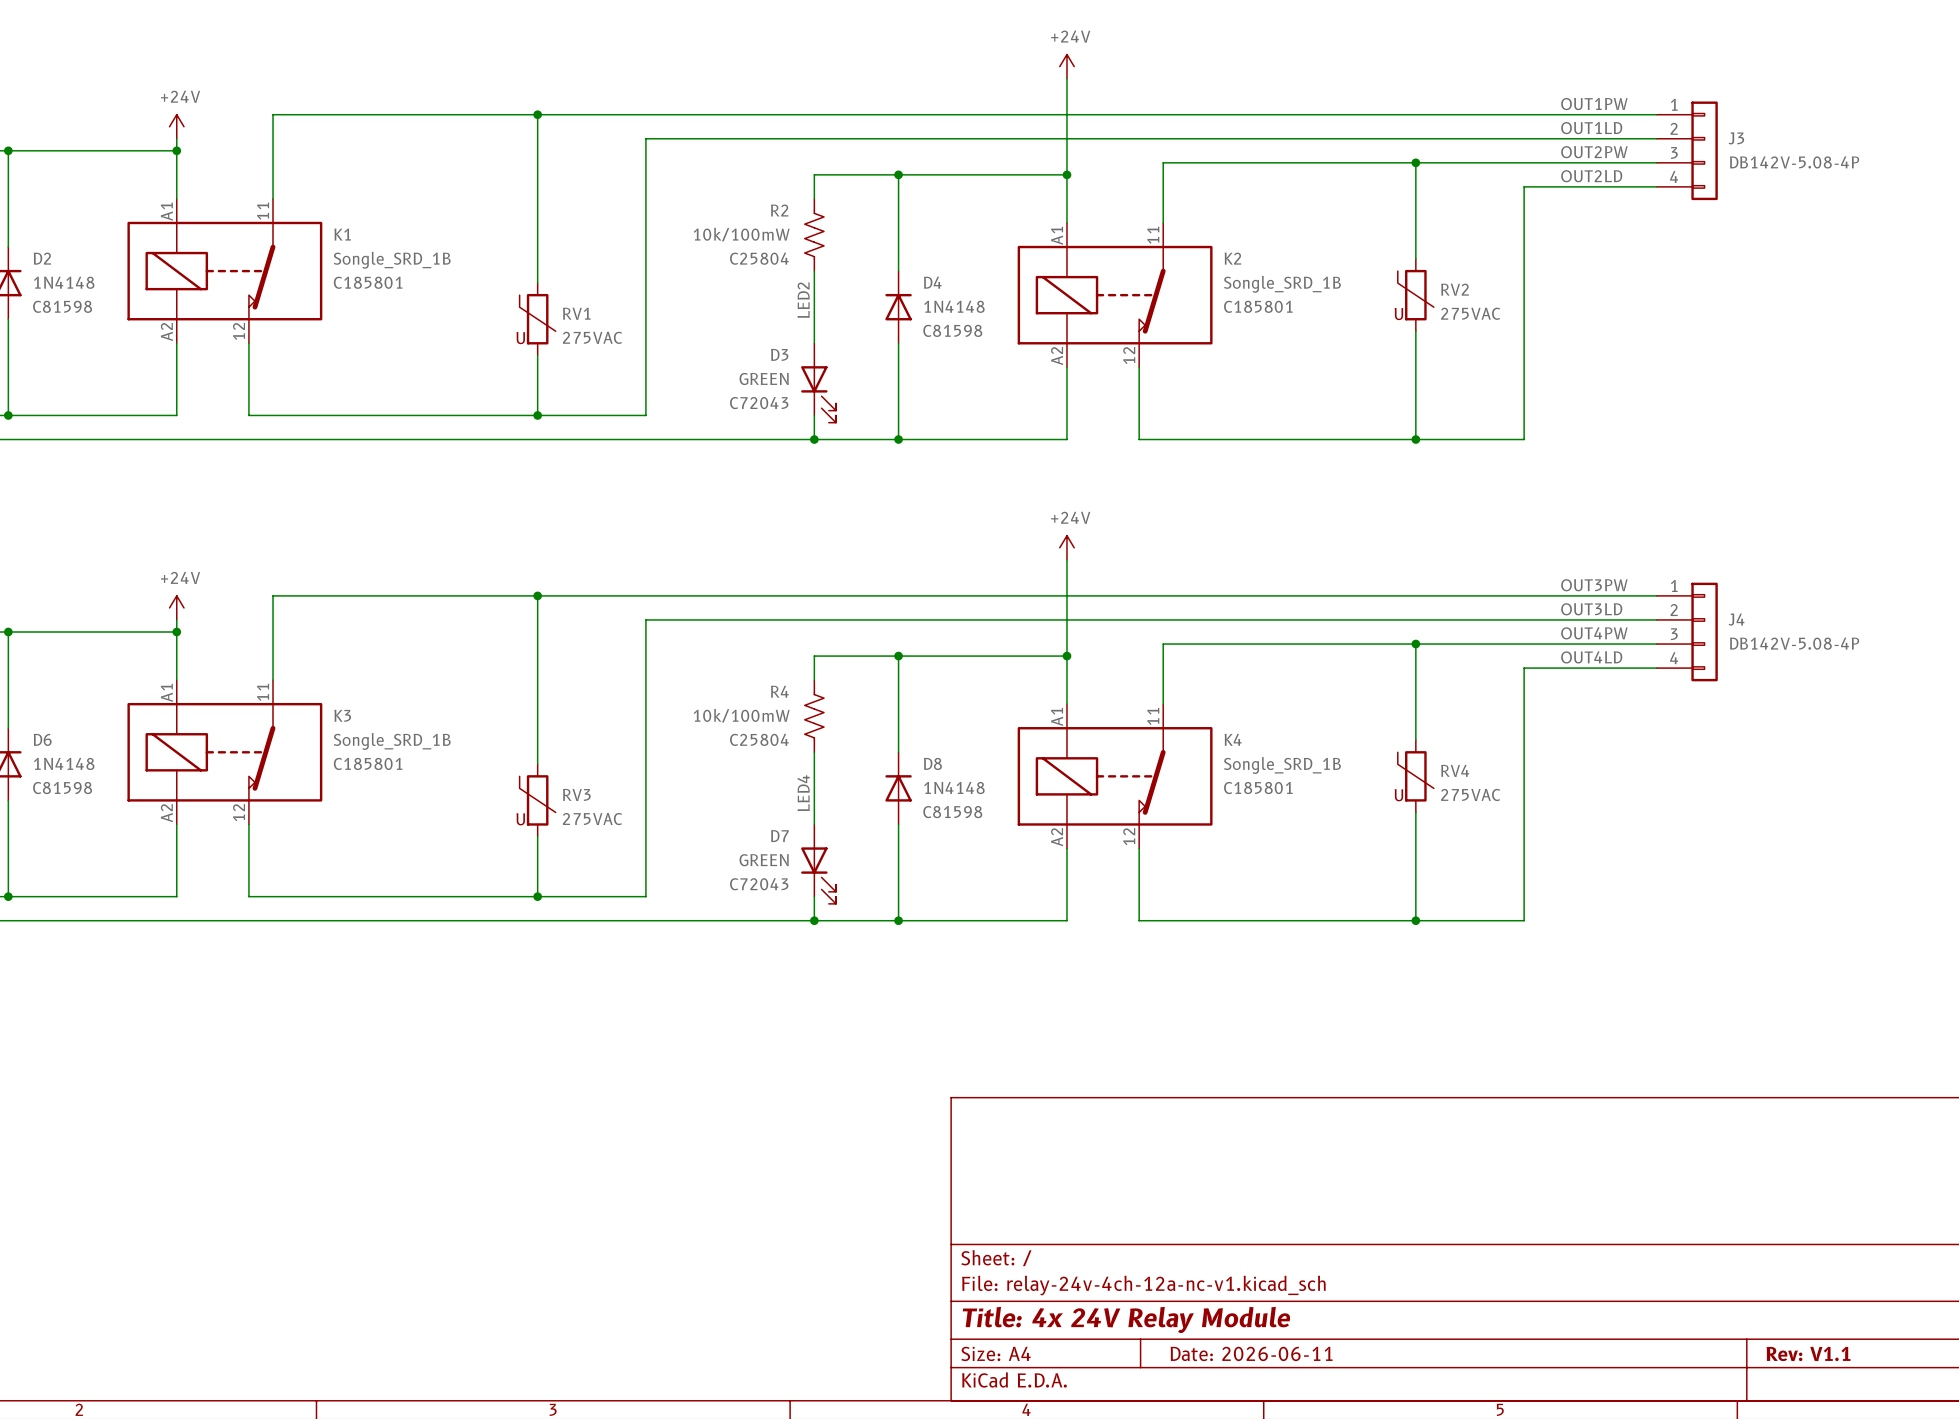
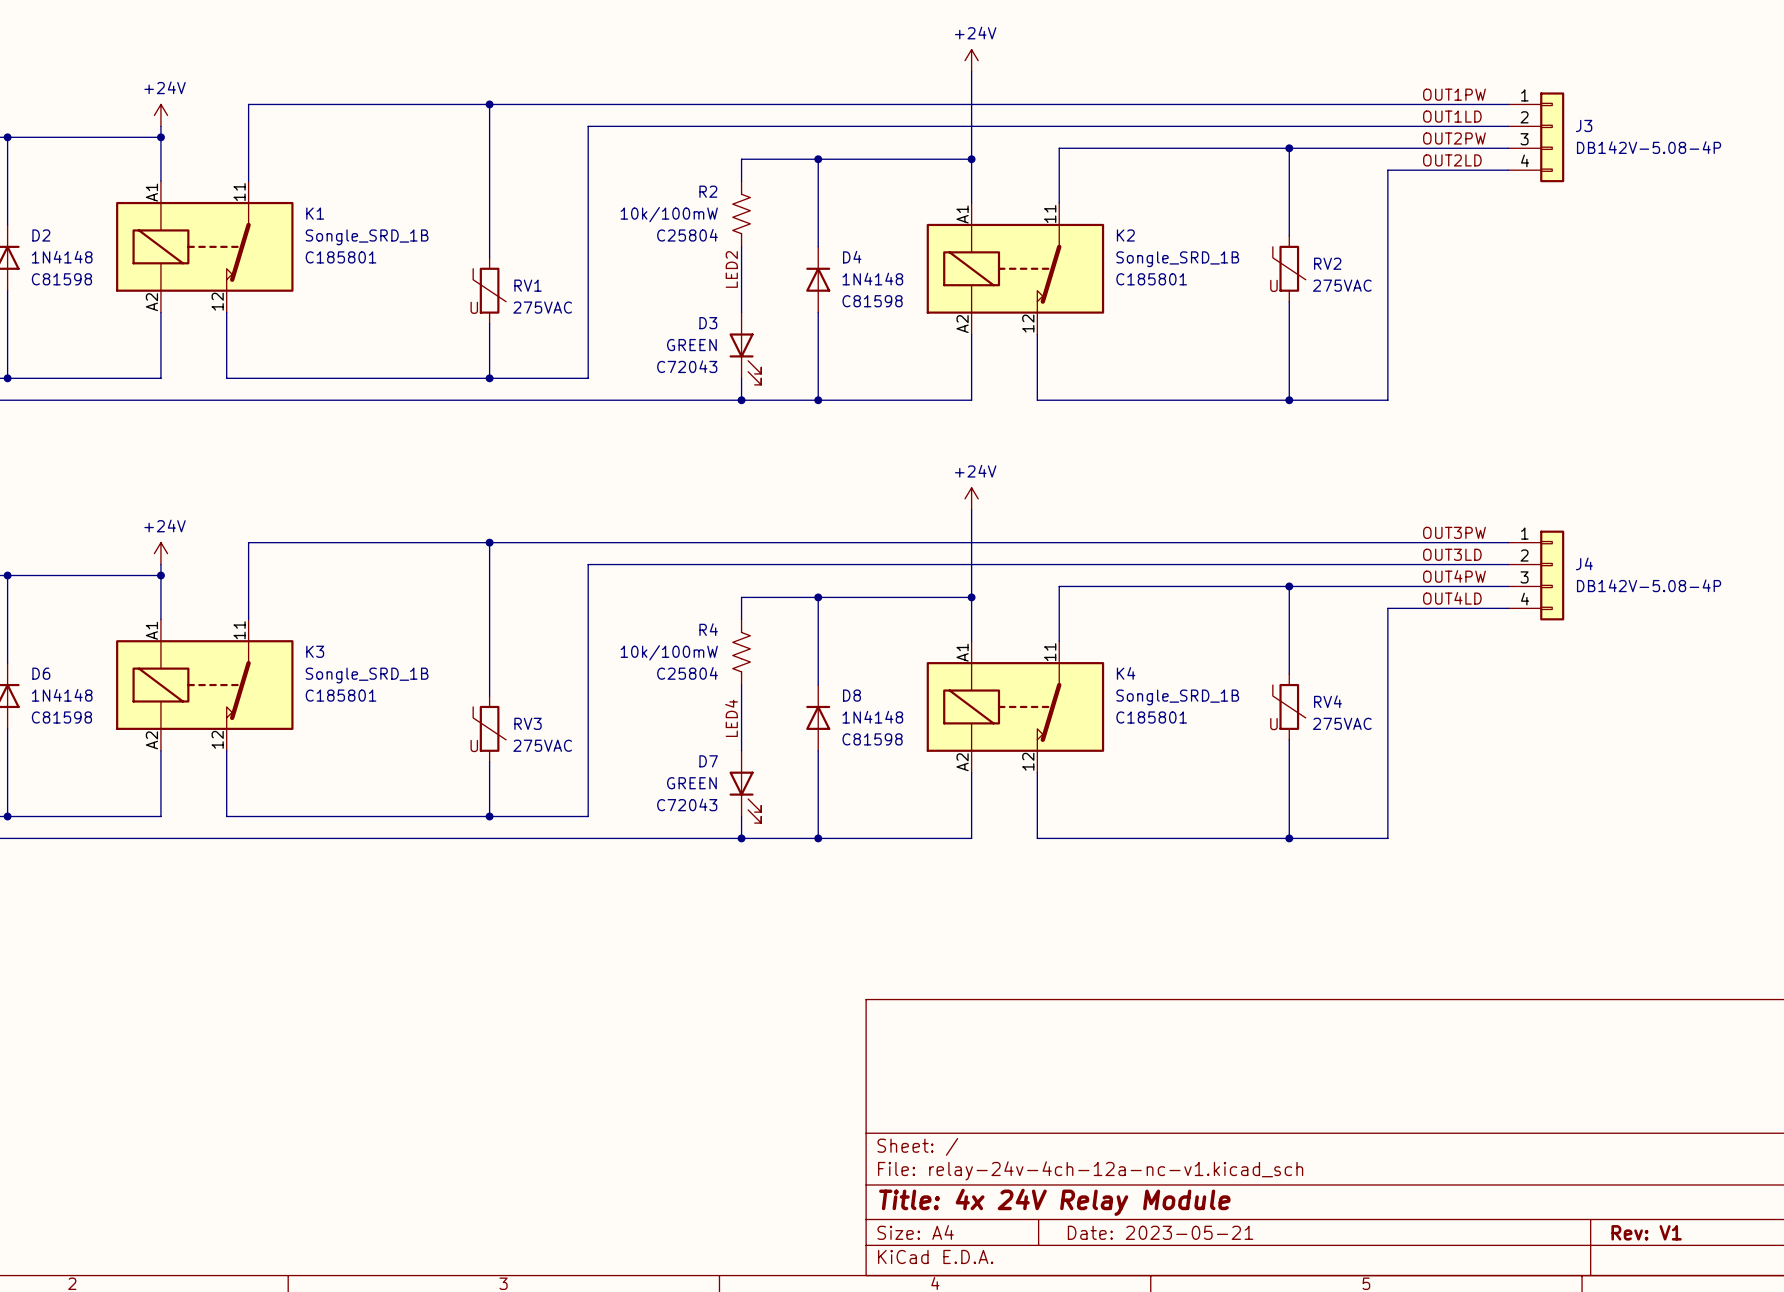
title block: Date: 2026-06-11 (1251, 1353) -> Date: 2023-05-21 (1160, 1232)
title block: Rev: V1.1 (1808, 1353) -> Rev: V1 (1646, 1232)

